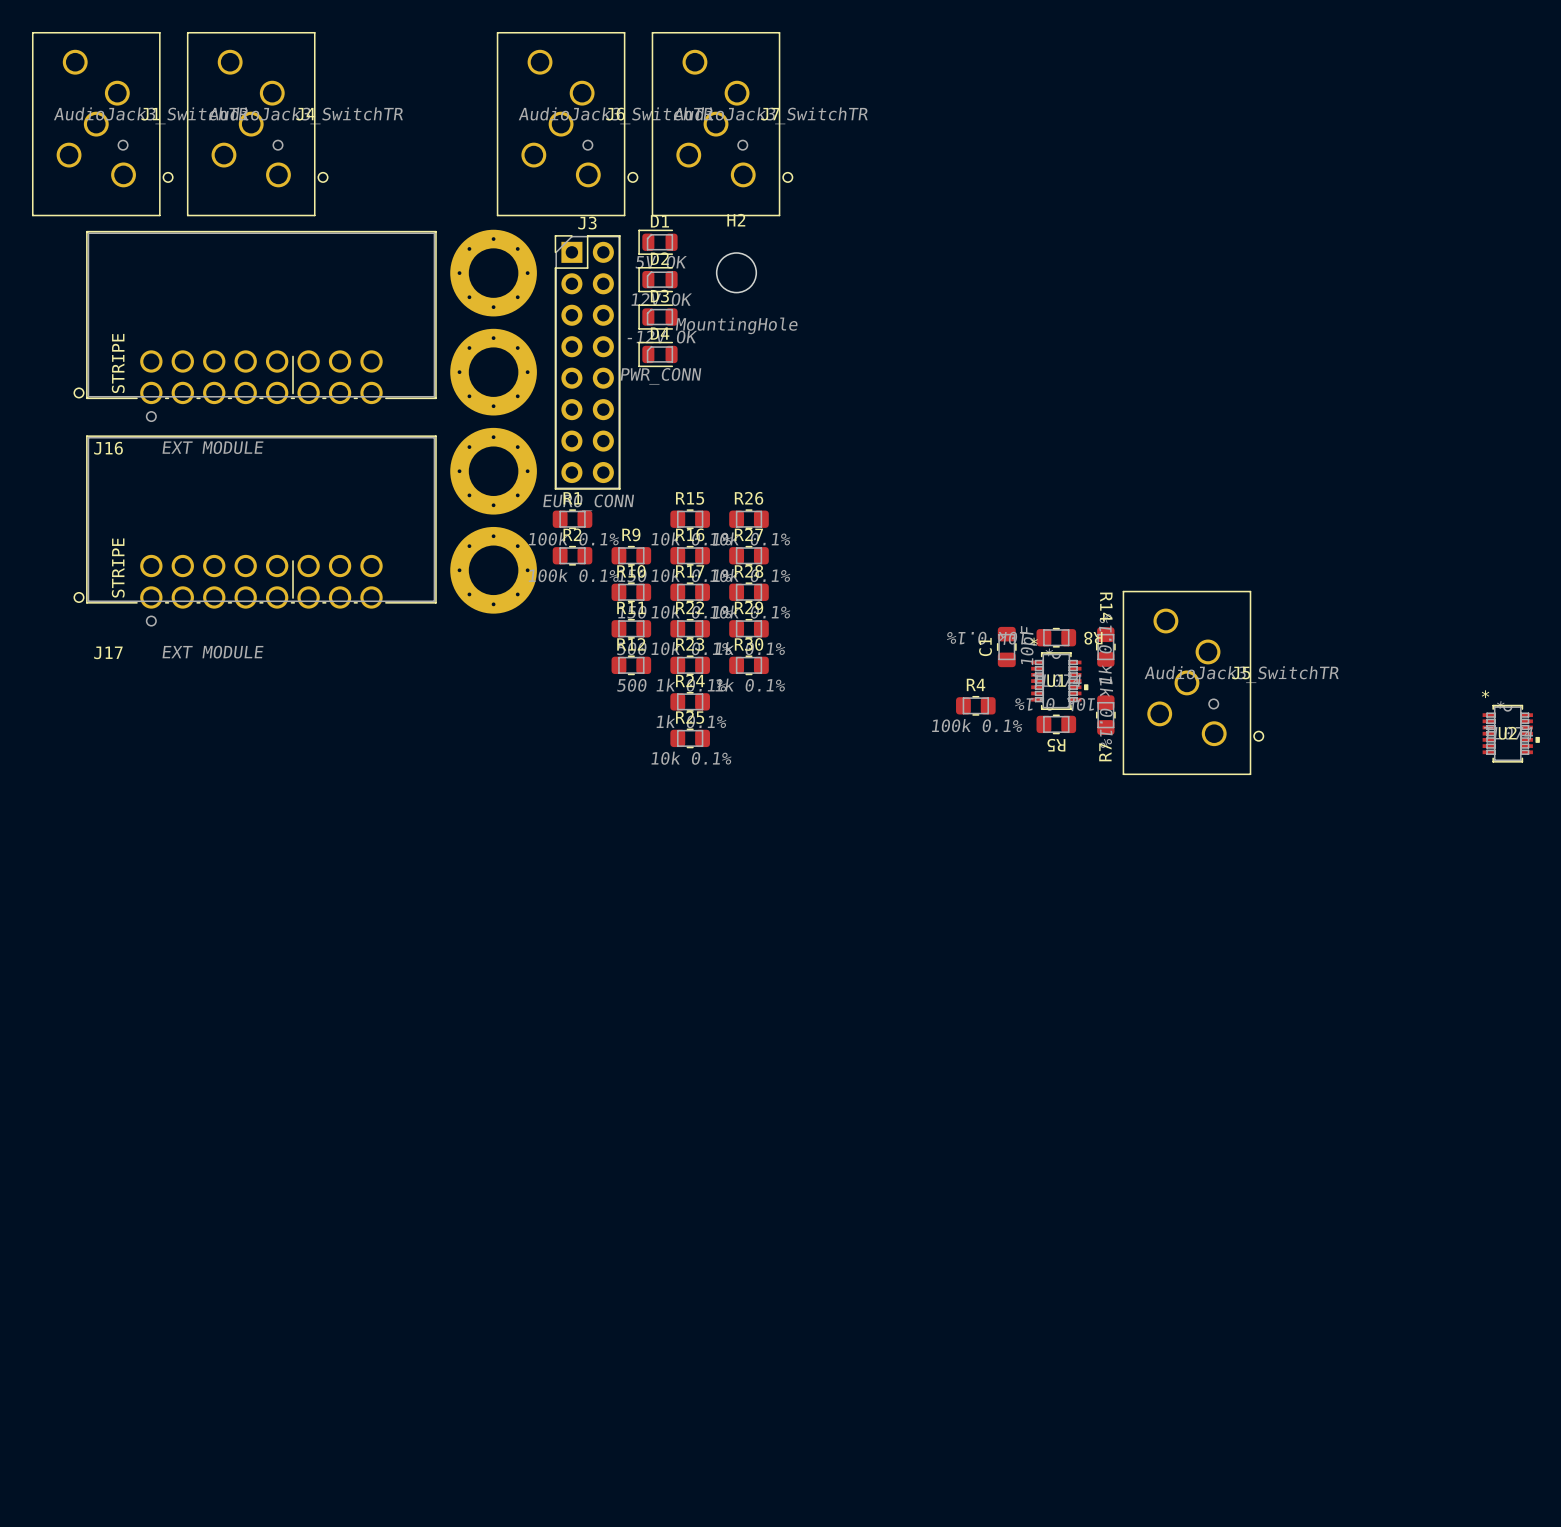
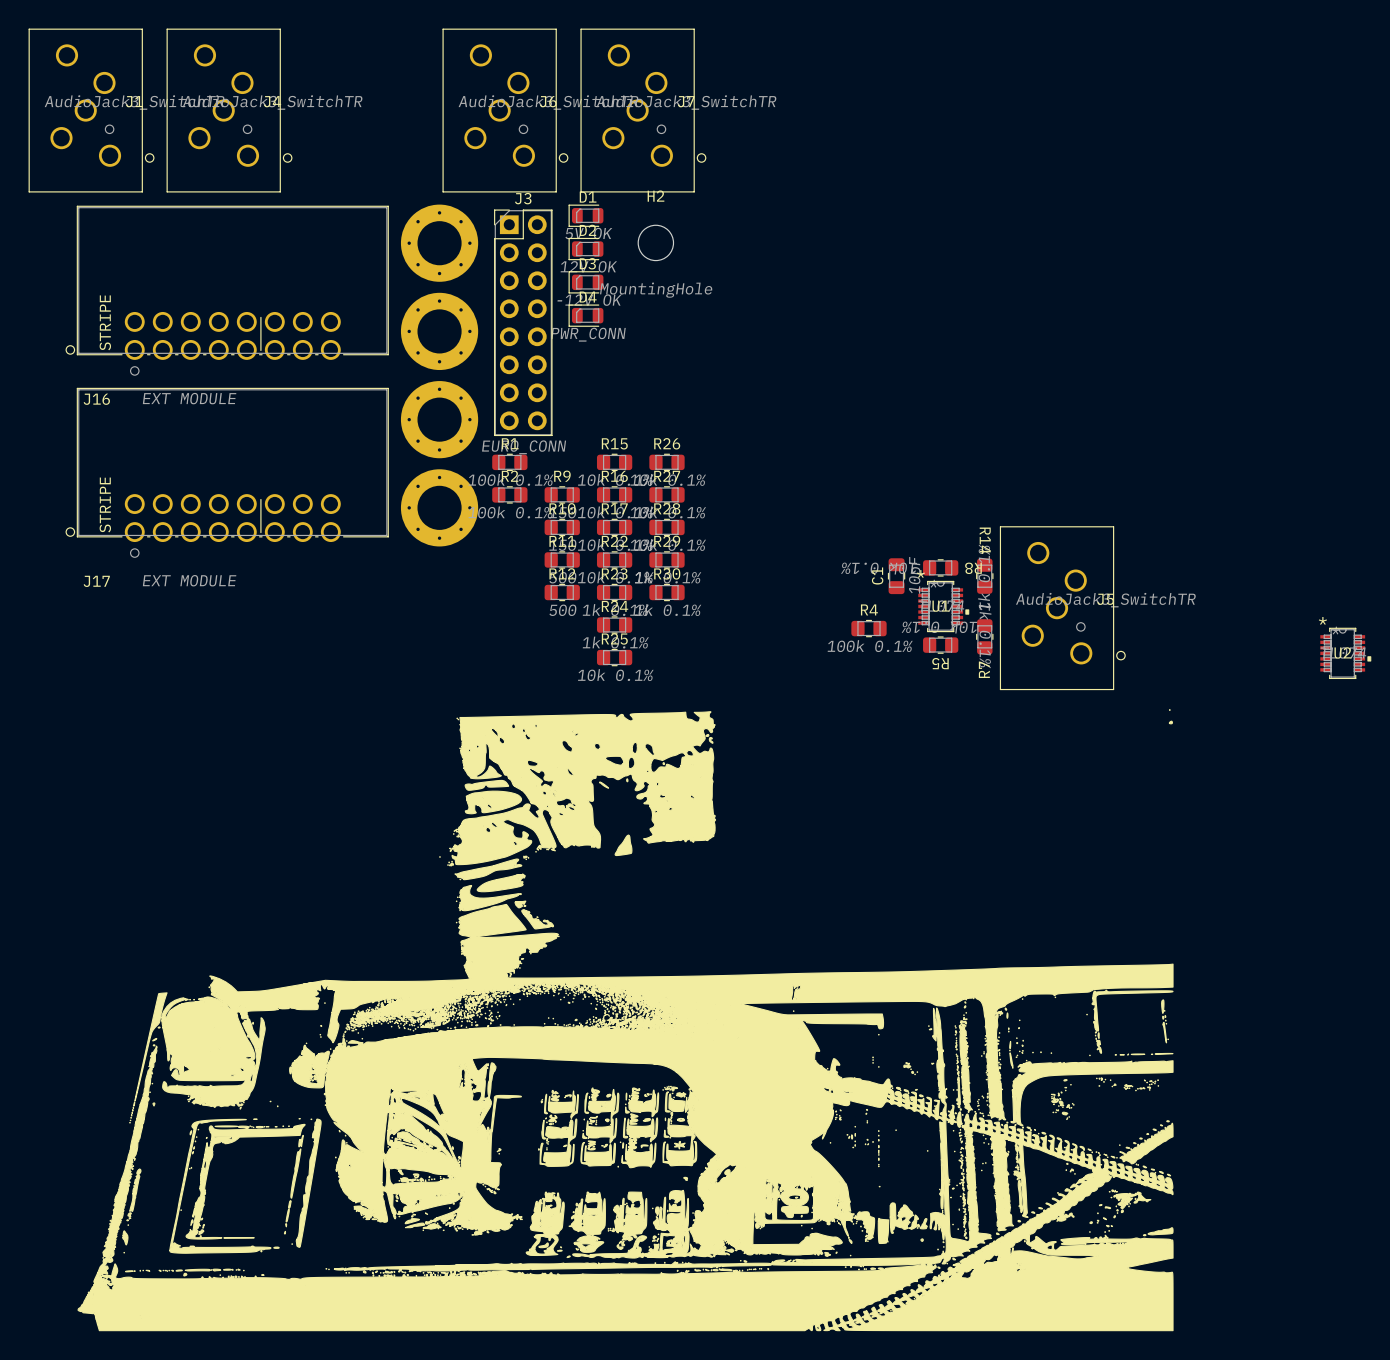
part: none -> (625, 1020)

